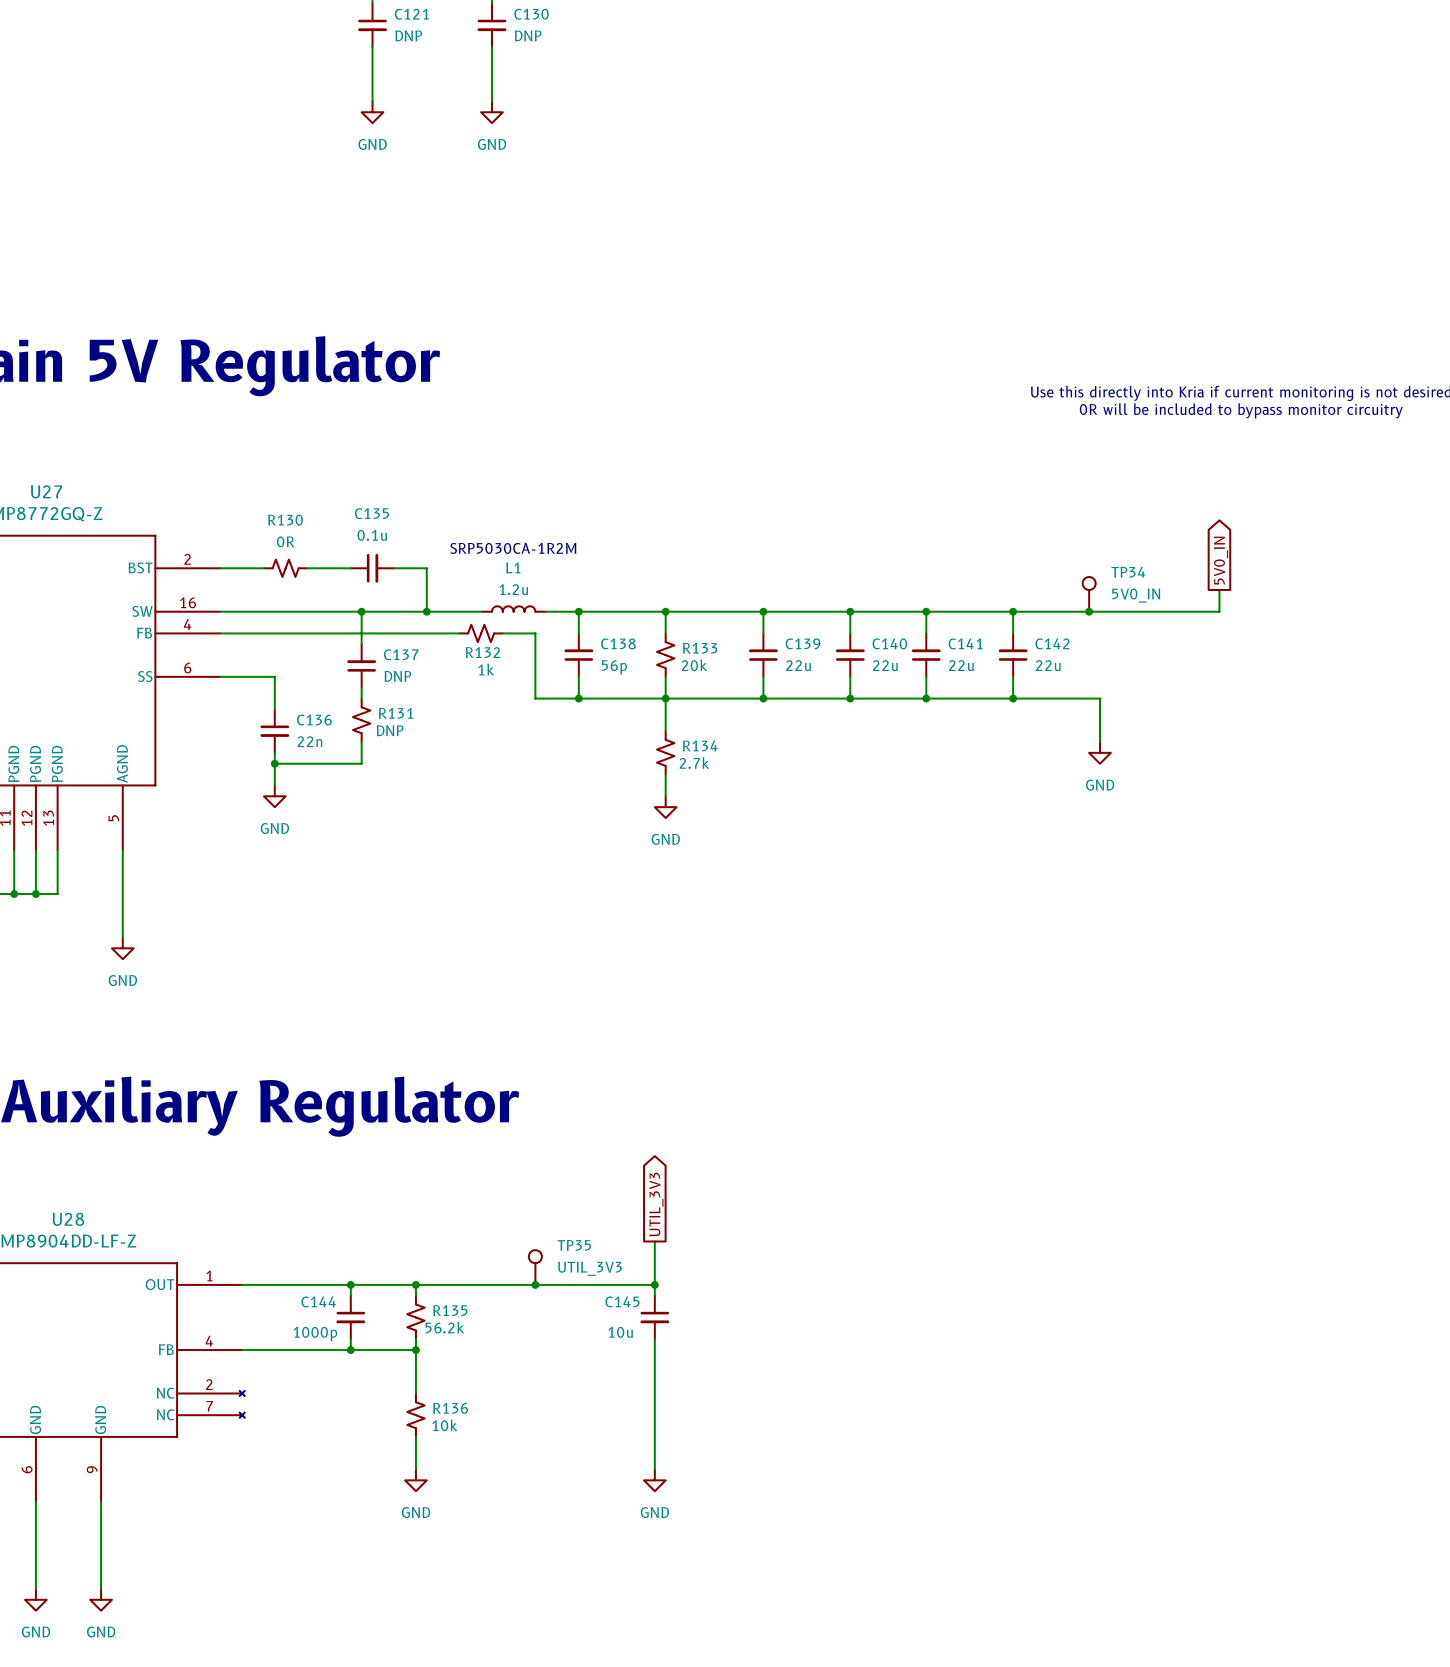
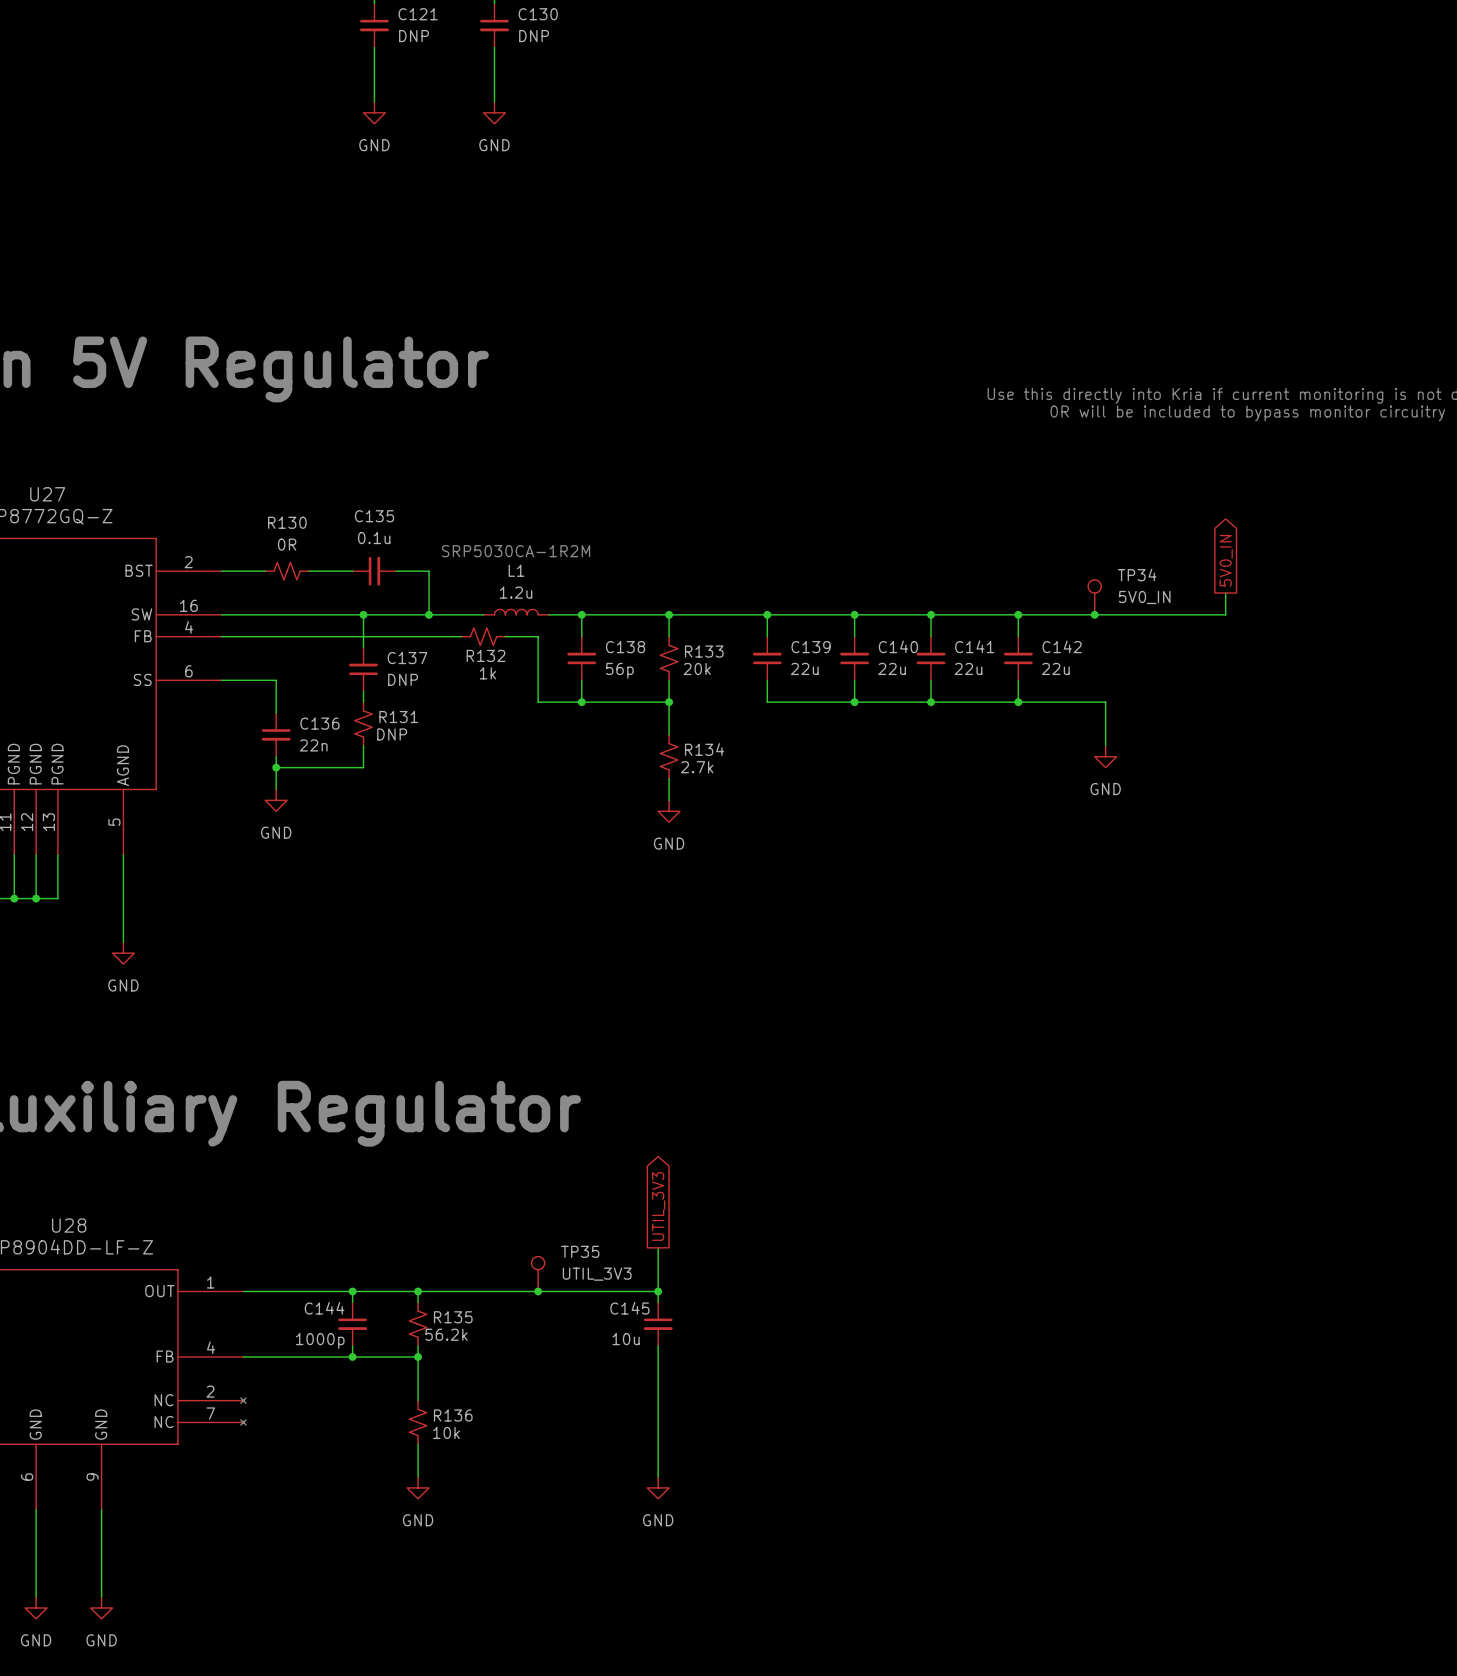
wire: (665, 698) (763, 698) -> none
junction: (763, 698) -> none

